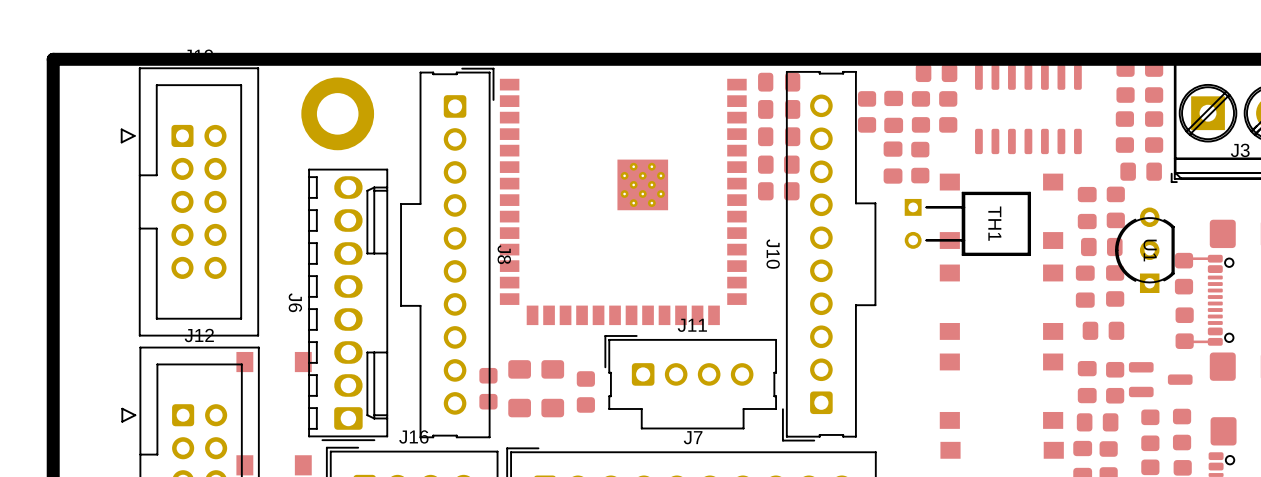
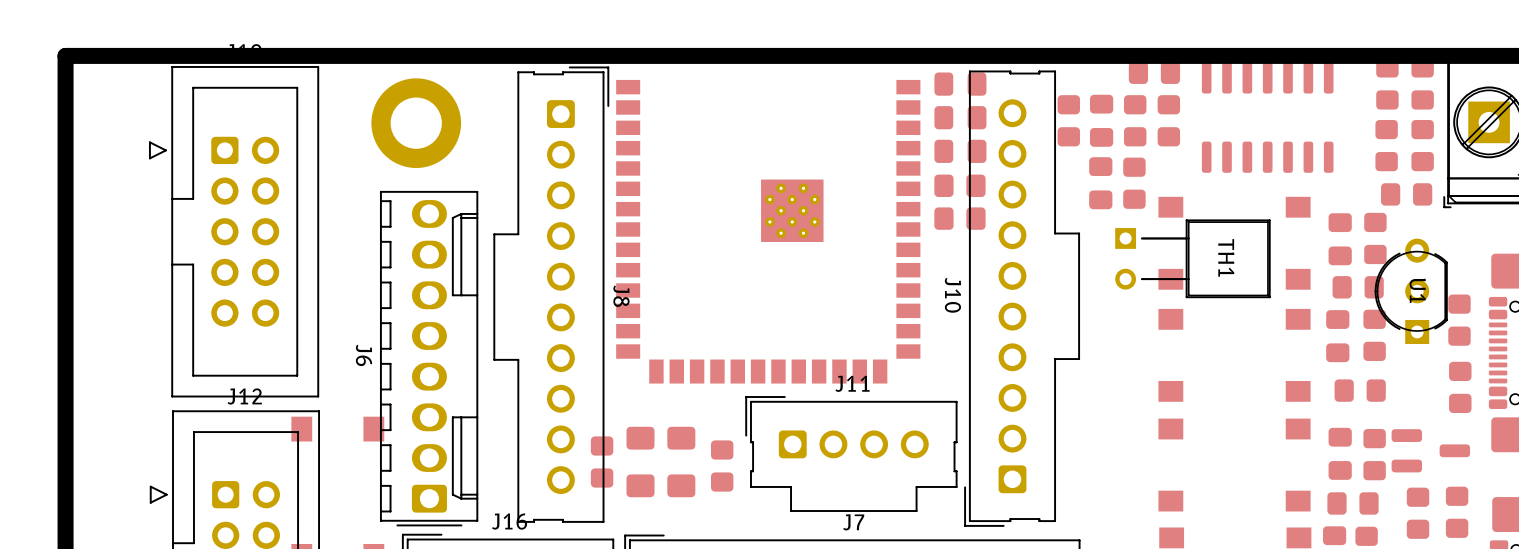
top track: (1215, 258) (1185, 258) (1184, 260) -> none
top track: (1184, 341) (1215, 341) -> none

